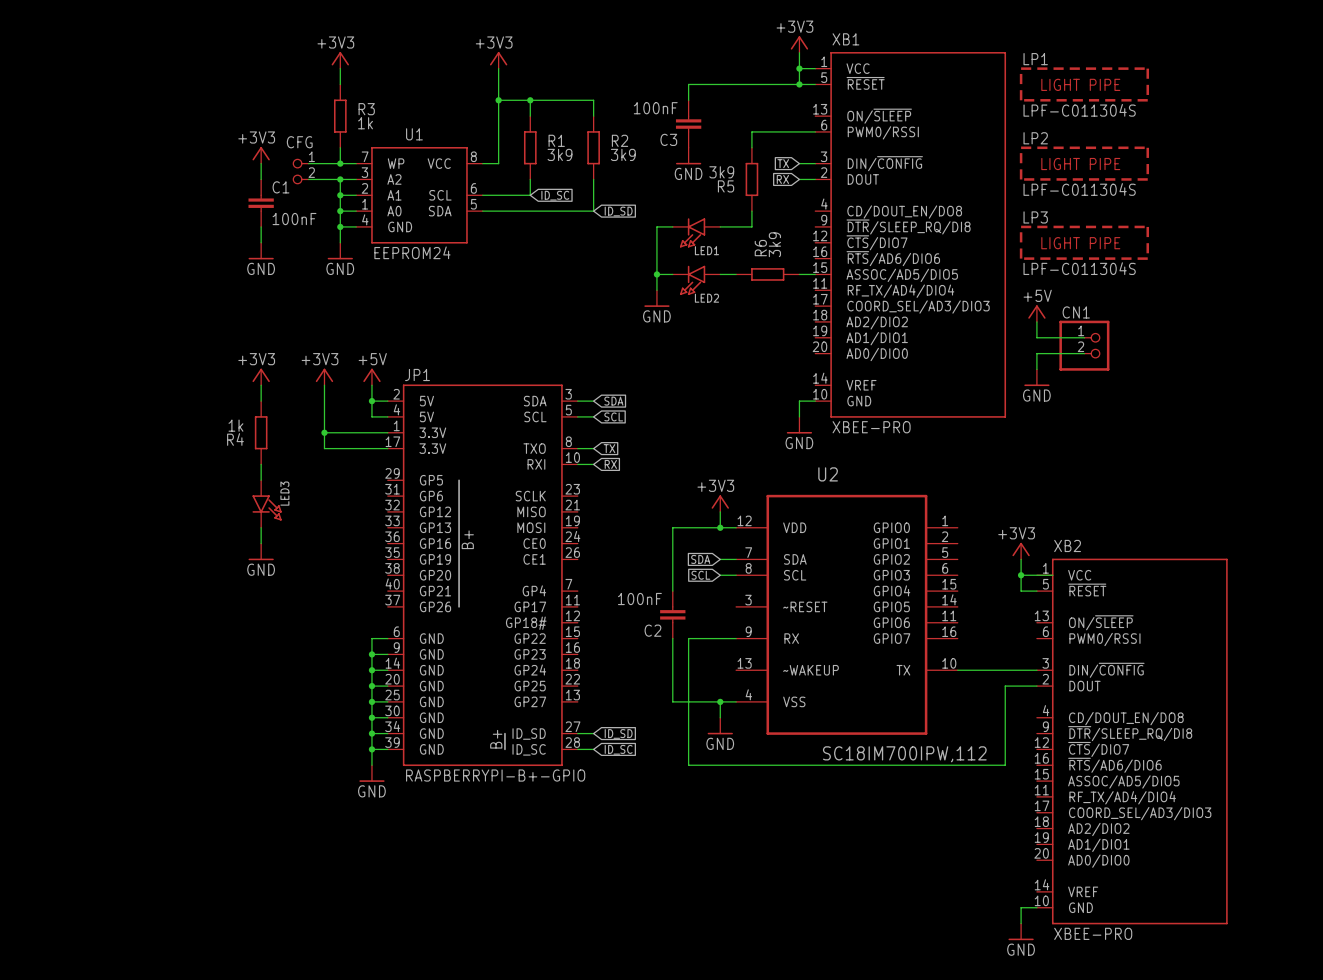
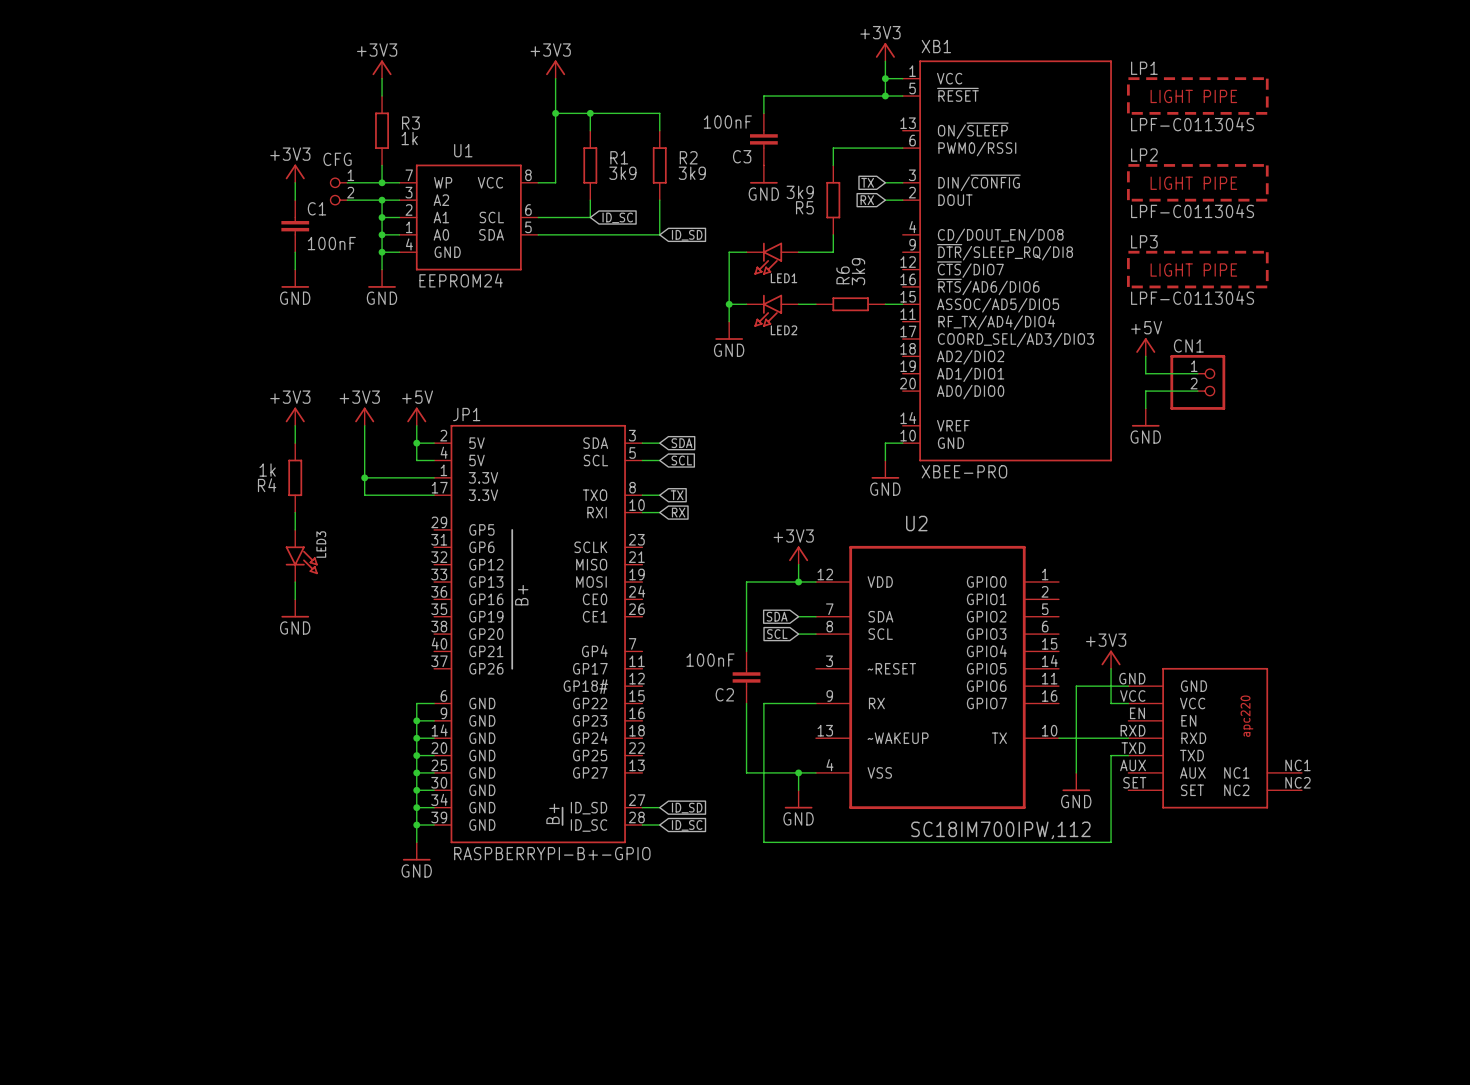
power symbol position: +3V3 (1021, 551) -> +3V3 (1111, 659)
wire: (1021, 559) (1021, 591) (1036, 591) -> (1111, 668) (1111, 703) (1128, 703)
wire: (1021, 575) (1052, 575) -> none
junction: (1021, 575) -> none
wire: none -> (1128, 686) (1076, 686) (1076, 772)
part: none -> (1215, 738)
power symbol: none -> GND (1076, 782)
XB2: XBEE-PRO (1132, 741) -> none
wire: (1036, 907) (1021, 907) (1021, 923) -> none
power symbol: GND (1021, 931) -> none

